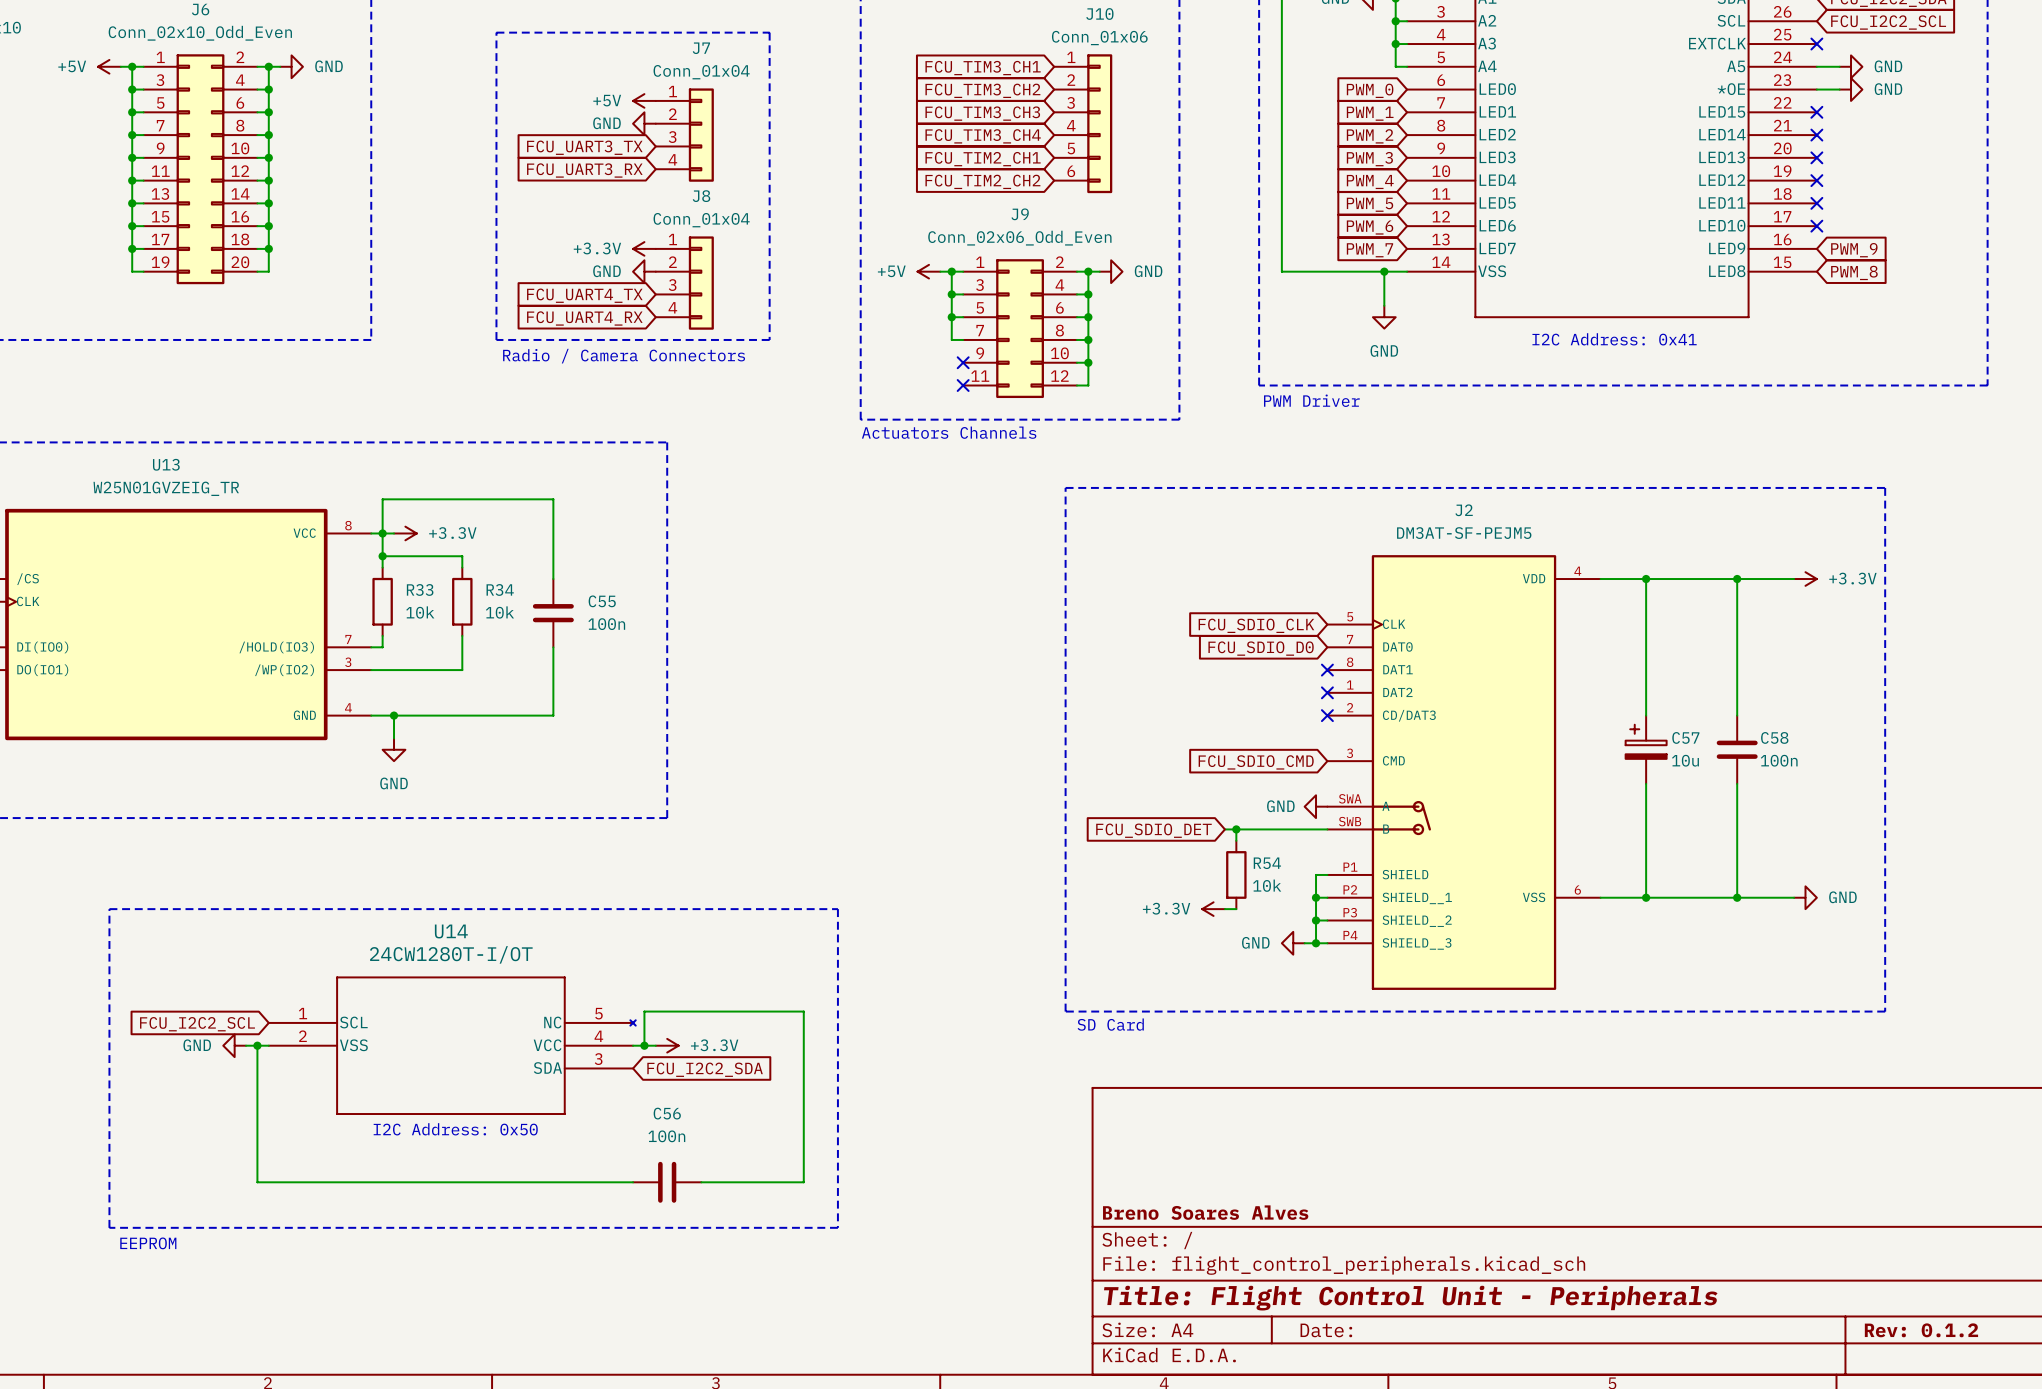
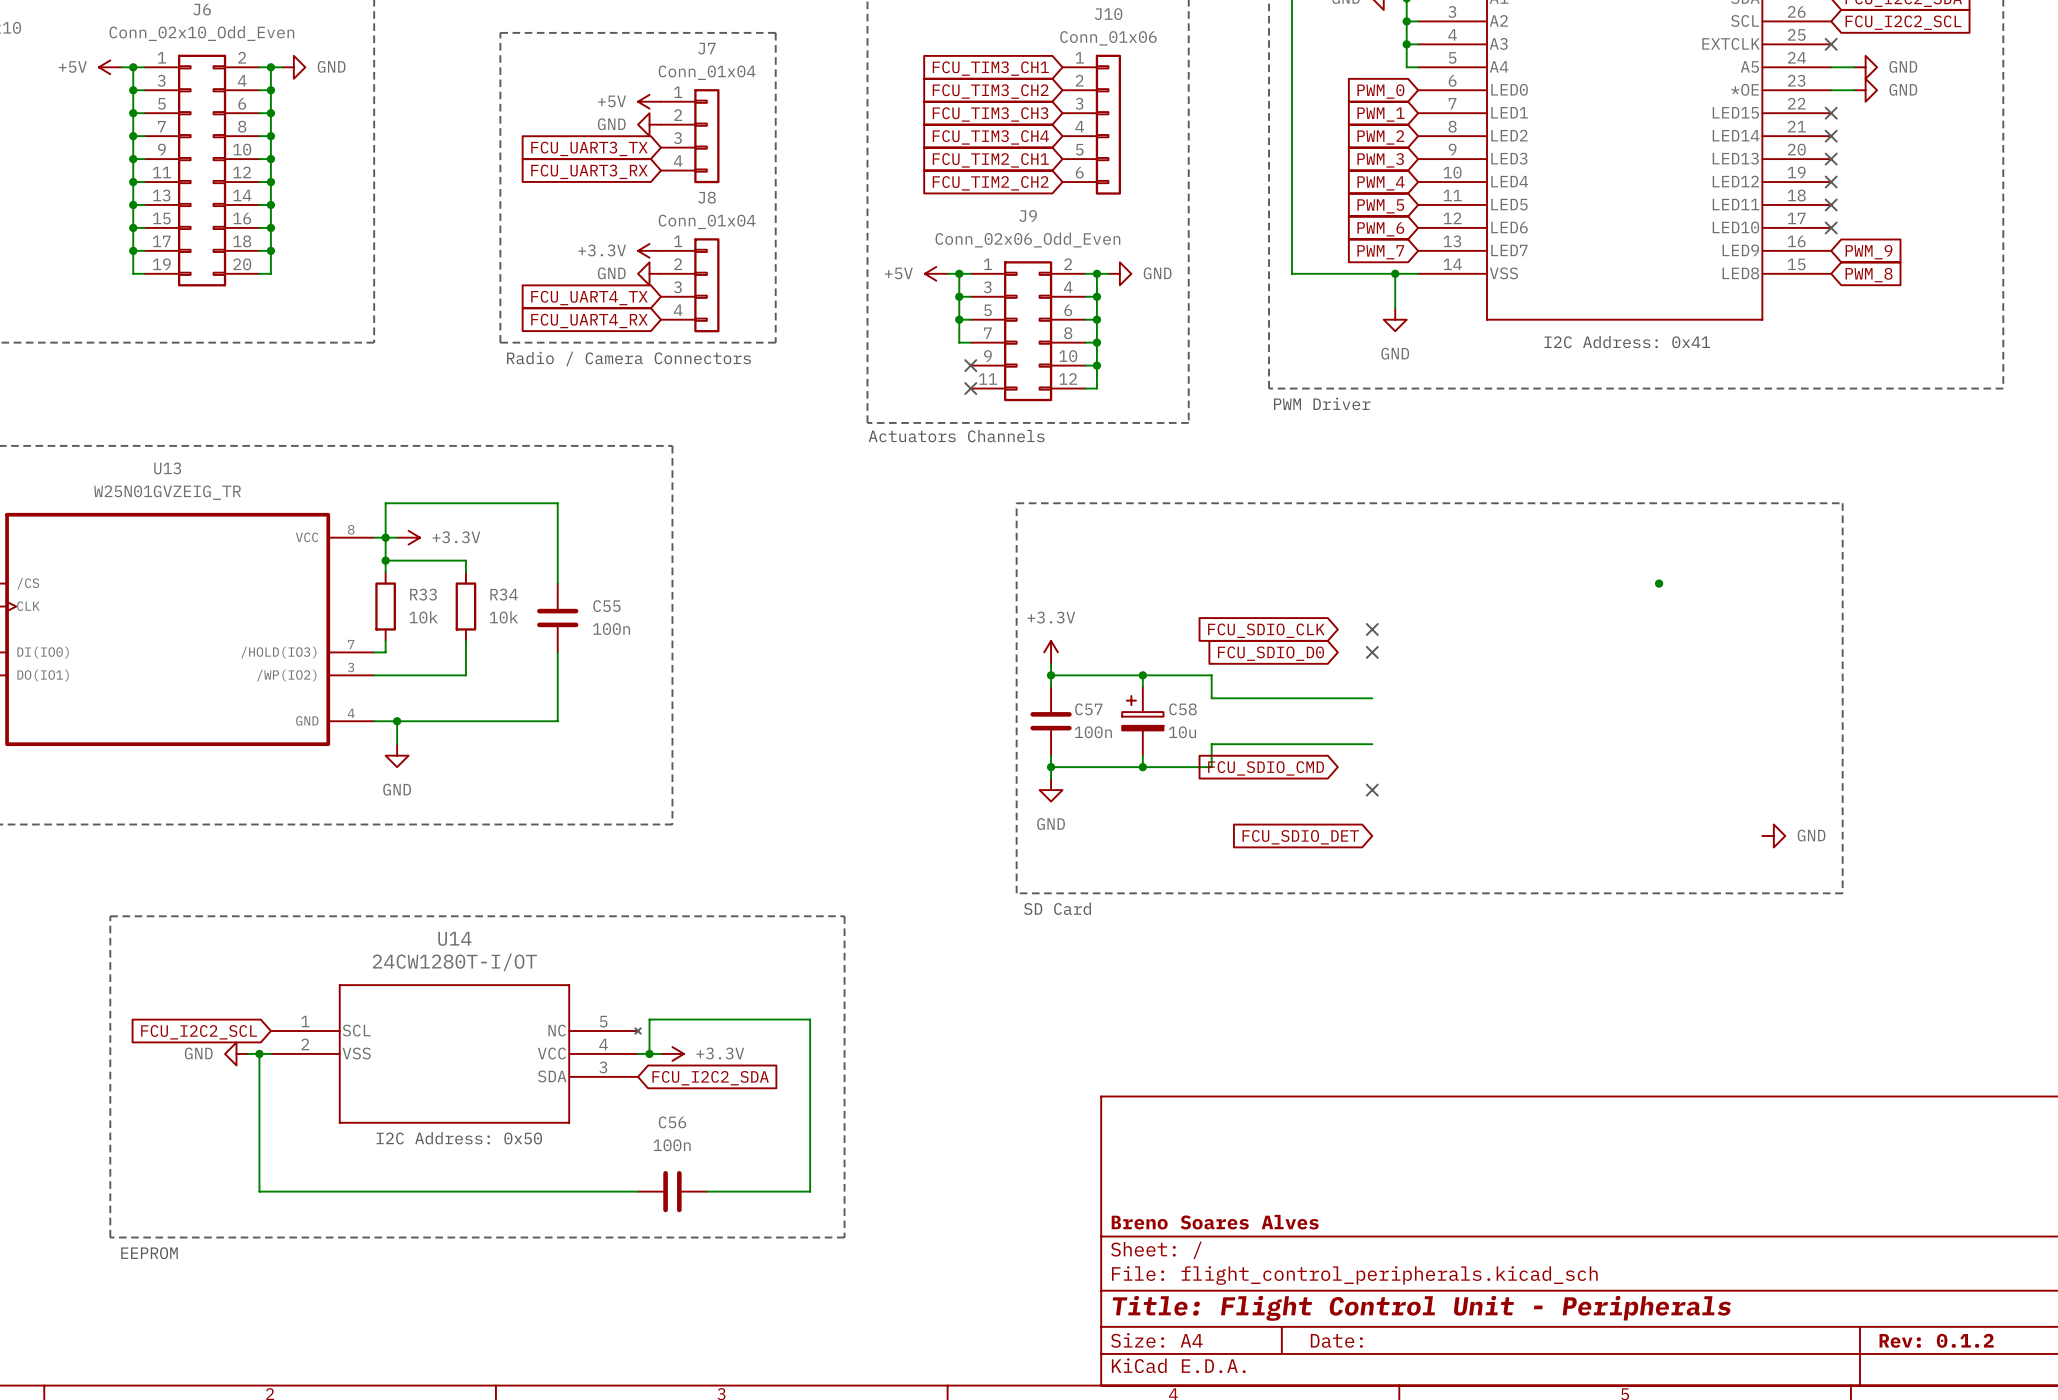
line: (1065, 487) (1885, 487) (1885, 1011) (1065, 1011) (1065, 487) -> (1016, 503) (1016, 893) (1842, 893) (1842, 503) (1016, 503)
wire: (1600, 579) (1794, 579) -> none
wire: (1646, 579) (1646, 715) -> none
wire: (1737, 579) (1737, 715) -> none
junction: (1737, 579) -> none
power symbol: +3.3V (1805, 579) -> none
no-connect mark: none -> (1372, 629)
power symbol: none -> +3.3V (1051, 652)
no-connect mark: none -> (1372, 652)
wire: none -> (1051, 663) (1051, 686)
wire: none -> (1051, 675) (1211, 675) (1211, 698) (1372, 698)
junction: none -> (1051, 675)
wire: none -> (1142, 675) (1142, 686)
junction: none -> (1142, 675)
no-connect mark: (1327, 670) -> none
no-connect mark: (1327, 692) -> none
no-connect mark: (1327, 715) -> none
C57 symbol: [1625, 715, 1667, 784] -> [1030, 686, 1072, 756]
C58 symbol: [1716, 715, 1758, 784] -> [1122, 686, 1164, 756]
wire: none -> (1372, 744) (1211, 744) (1211, 767) (1051, 767)
wire: none -> (1051, 755) (1051, 778)
C57 value: 10u (1685, 760) -> 100n (1093, 732)
C58 value: 100n (1779, 760) -> 10u (1182, 732)
junction: none -> (1051, 767)
junction: none -> (1142, 767)
J2: DM3AT-SF-PEJM5 (1464, 772) -> none
power symbol: none -> GND (1051, 790)
no-connect mark: none -> (1372, 790)
wire: (1646, 783) (1646, 897) -> none
wire: (1737, 783) (1737, 897) -> none
power symbol: GND (1316, 806) -> none
wire: (1224, 829) (1327, 829) -> none
wire: (1236, 829) (1236, 840) -> (1142, 755) (1142, 767)
junction: (1236, 829) -> none
global label position: FCU_SDIO_DET (1153, 830) -> FCU_SDIO_DET (1300, 837)
R54: 10k (1236, 874) -> none
wire: (1327, 874) (1316, 874) (1316, 943) -> none
wire: (1316, 897) (1327, 897) -> none
junction: (1316, 897) -> none
wire: (1600, 897) (1794, 897) -> none
junction: (1646, 897) -> none
junction: (1737, 897) -> none
power symbol position: GND (1805, 897) -> GND (1773, 835)
power symbol: +3.3V (1213, 909) -> none
wire: (1224, 909) (1236, 909) -> none
wire: (1316, 920) (1327, 920) -> none
junction: (1316, 920) -> none
power symbol: GND (1293, 943) -> none
wire: (1304, 943) (1327, 943) -> none
junction: (1316, 943) -> none
text position: SD Card (1110, 1024) -> SD Card (1057, 908)

